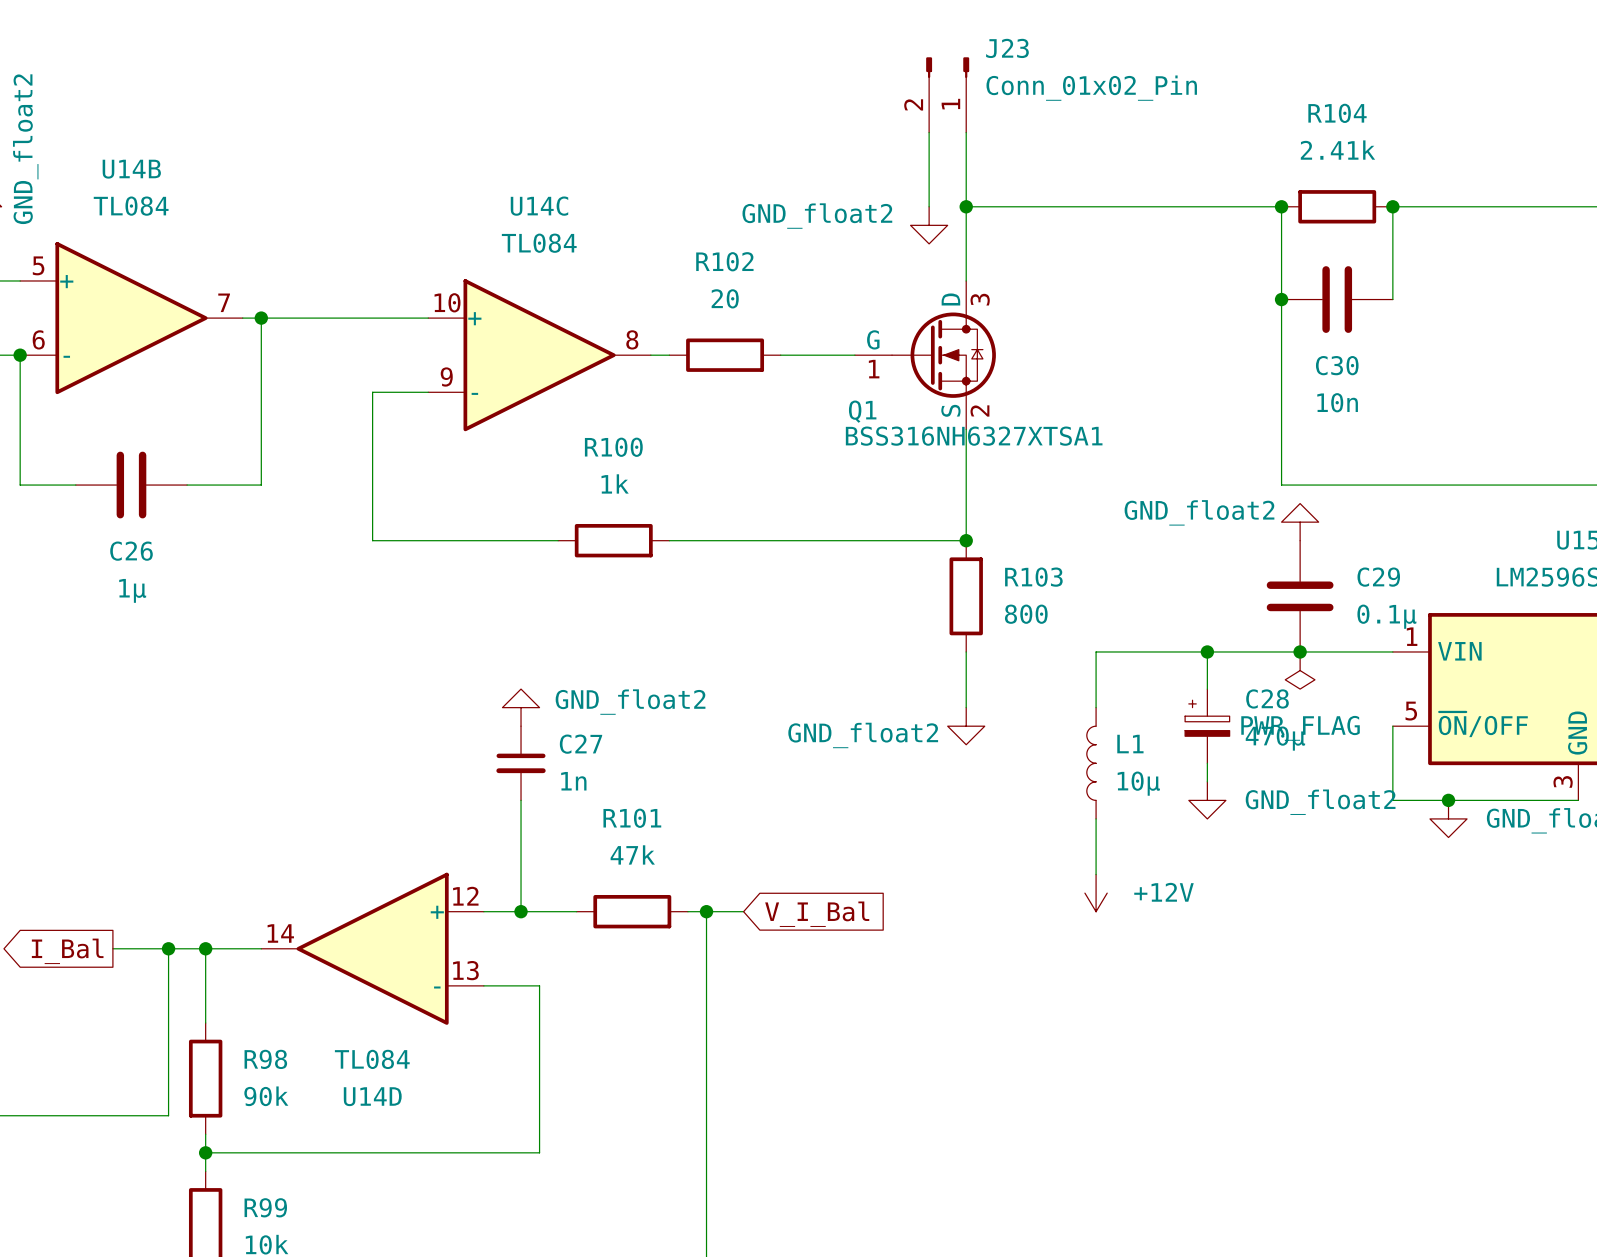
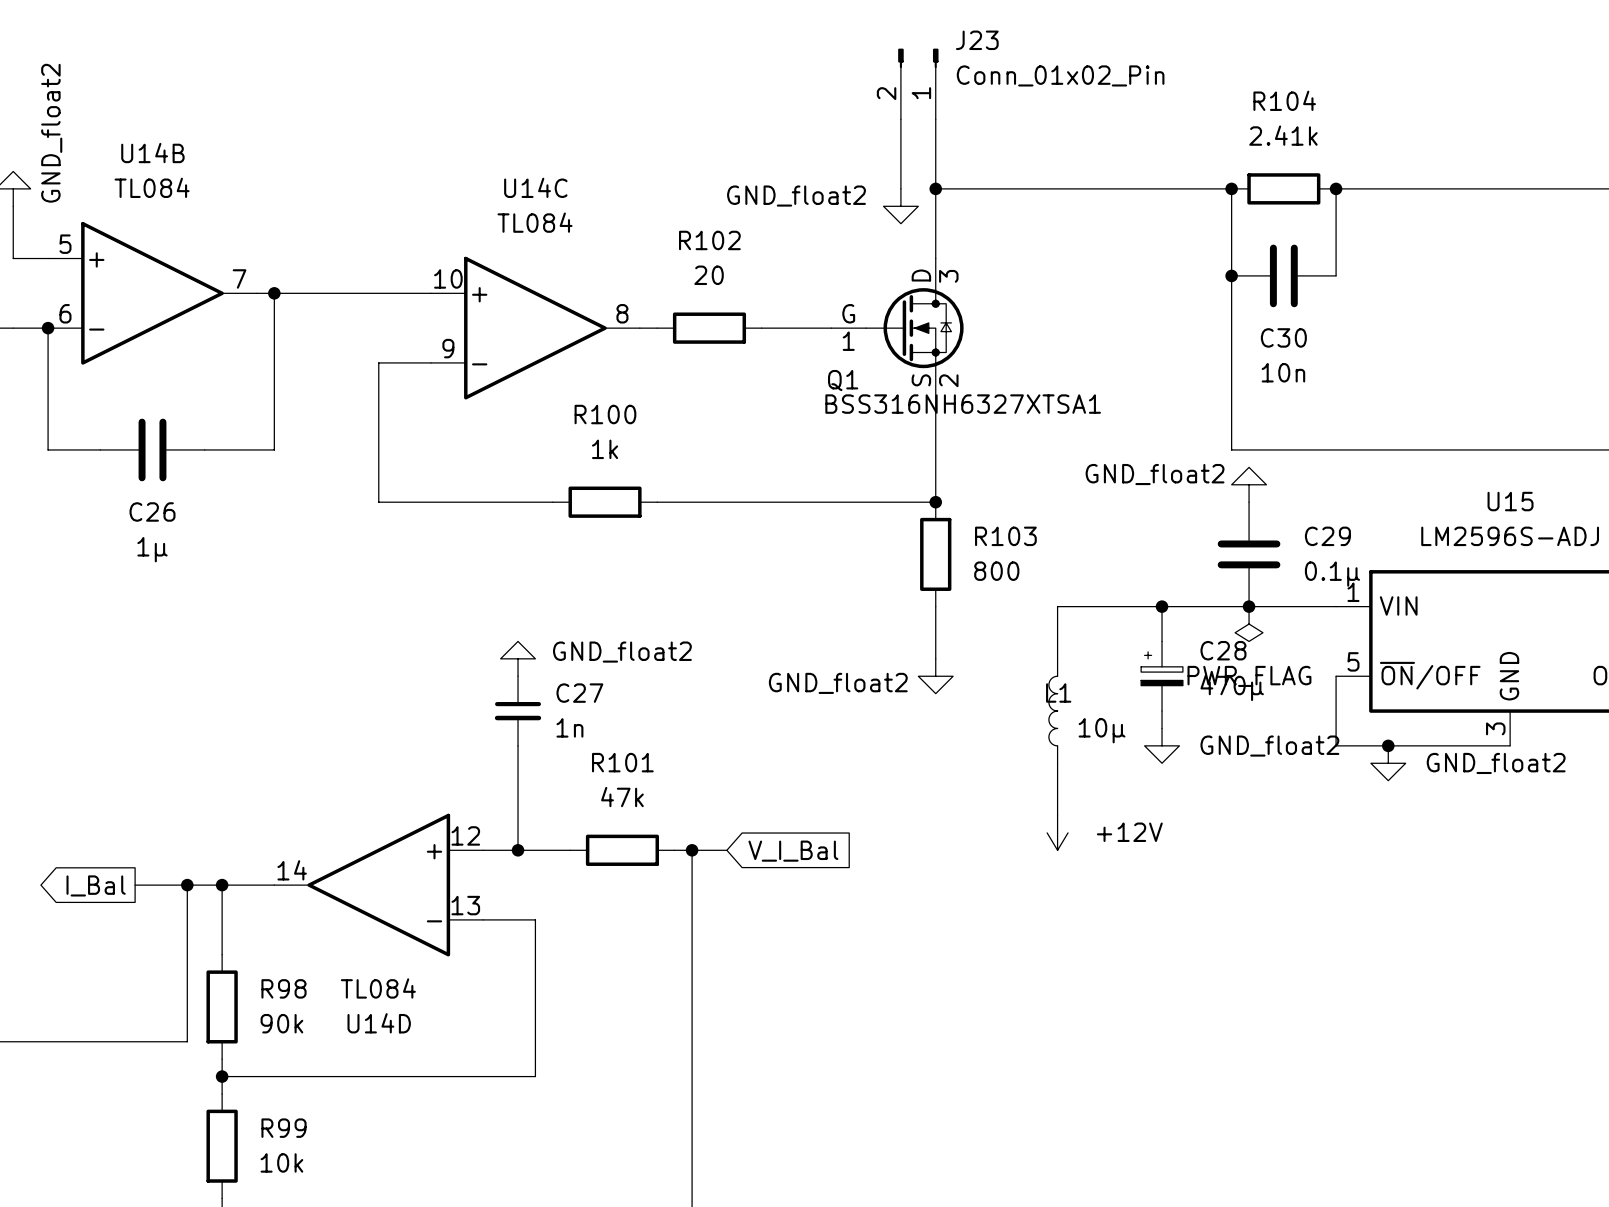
L1 name position: L1 (1130, 744) -> L1 (1058, 693)

